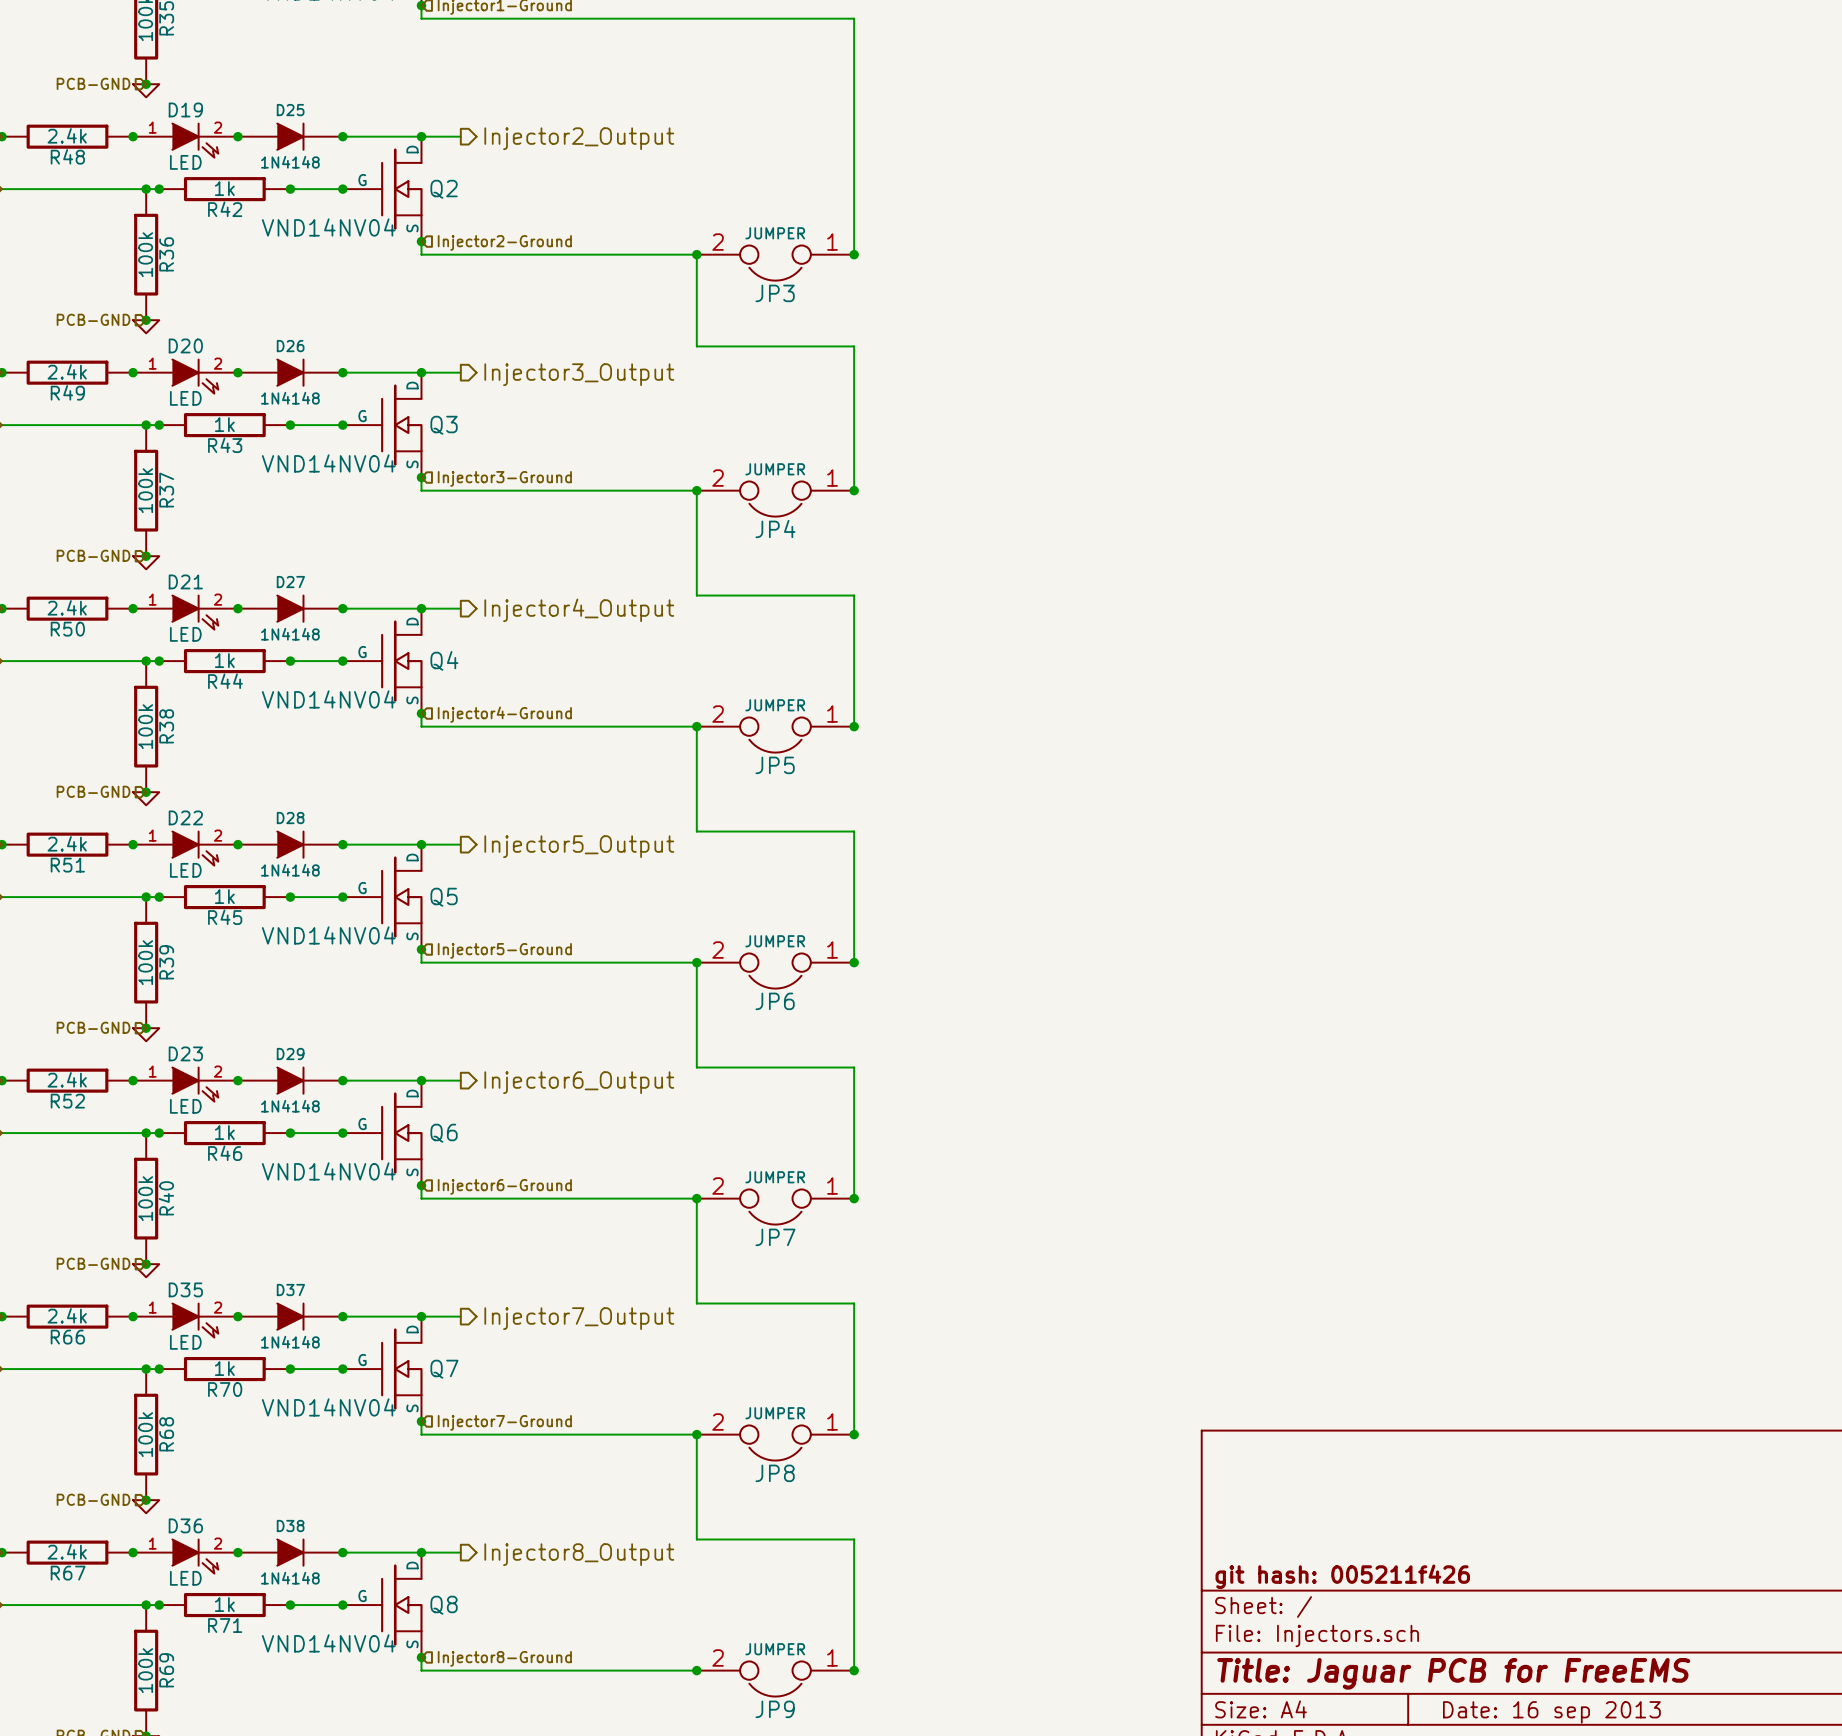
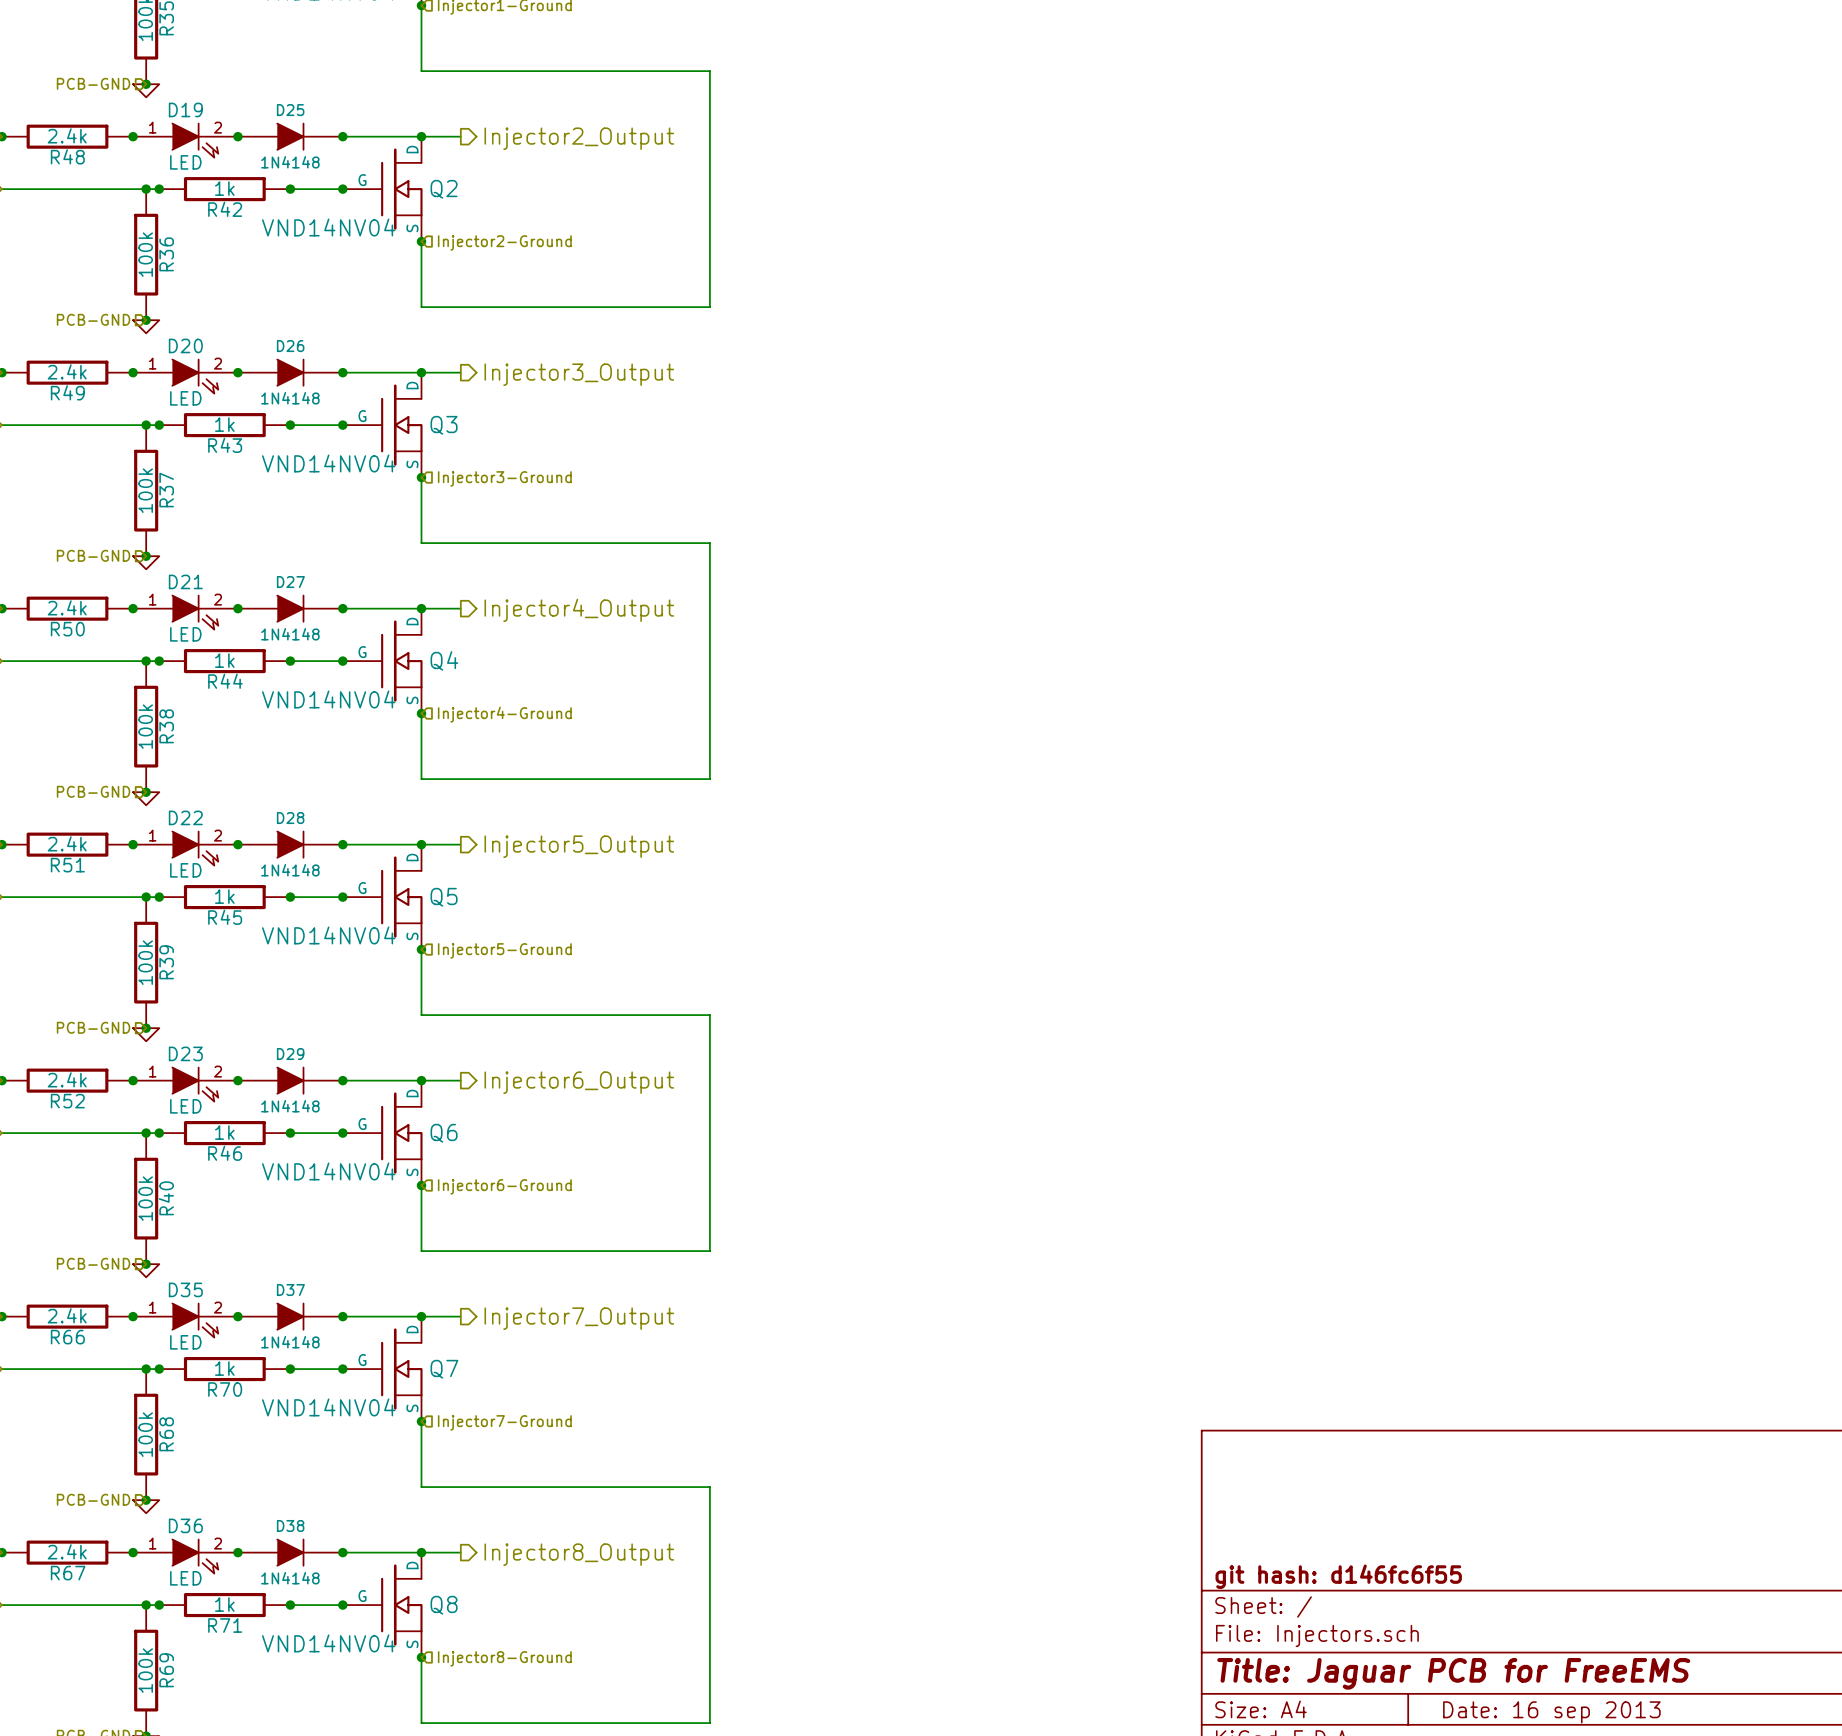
wire: (421, 18) (854, 18) (854, 254) -> (421, 18) (421, 71) (709, 71) (709, 307) (421, 307) (421, 254)
wire: (421, 254) (696, 254) (696, 346) (854, 346) (854, 490) -> none
junction: (696, 254) -> none
junction: (854, 254) -> none
JP3: JUMPER (775, 263) -> none
wire: (421, 490) (696, 490) (696, 595) (854, 595) (854, 726) -> (421, 490) (421, 543) (709, 543) (709, 779) (421, 779) (421, 726)
junction: (696, 490) -> none
junction: (854, 490) -> none
JP4: JUMPER (775, 499) -> none
wire: (421, 726) (696, 726) (696, 831) (854, 831) (854, 962) -> none
junction: (696, 726) -> none
junction: (854, 726) -> none
JP5: JUMPER (775, 735) -> none
wire: (421, 962) (696, 962) (696, 1067) (854, 1067) (854, 1198) -> (421, 962) (421, 1015) (709, 1015) (709, 1251) (421, 1251) (421, 1198)
junction: (696, 962) -> none
junction: (854, 962) -> none
JP6: JUMPER (775, 971) -> none
wire: (421, 1198) (696, 1198) (696, 1303) (854, 1303) (854, 1434) -> none
junction: (696, 1198) -> none
junction: (854, 1198) -> none
JP7: JUMPER (775, 1207) -> none
wire: (421, 1434) (696, 1434) (696, 1539) (854, 1539) (854, 1670) -> none
junction: (696, 1434) -> none
junction: (854, 1434) -> none
JP8: JUMPER (775, 1443) -> none
title block: git hash: 005211f426 (1342, 1576) -> git hash: d146fc6f55 (1338, 1576)
wire: (421, 1670) (696, 1670) -> (421, 1670) (421, 1723) (709, 1723) (709, 1487) (421, 1487) (421, 1434)
junction: (696, 1670) -> none
junction: (854, 1670) -> none
JP9: JUMPER (775, 1678) -> none

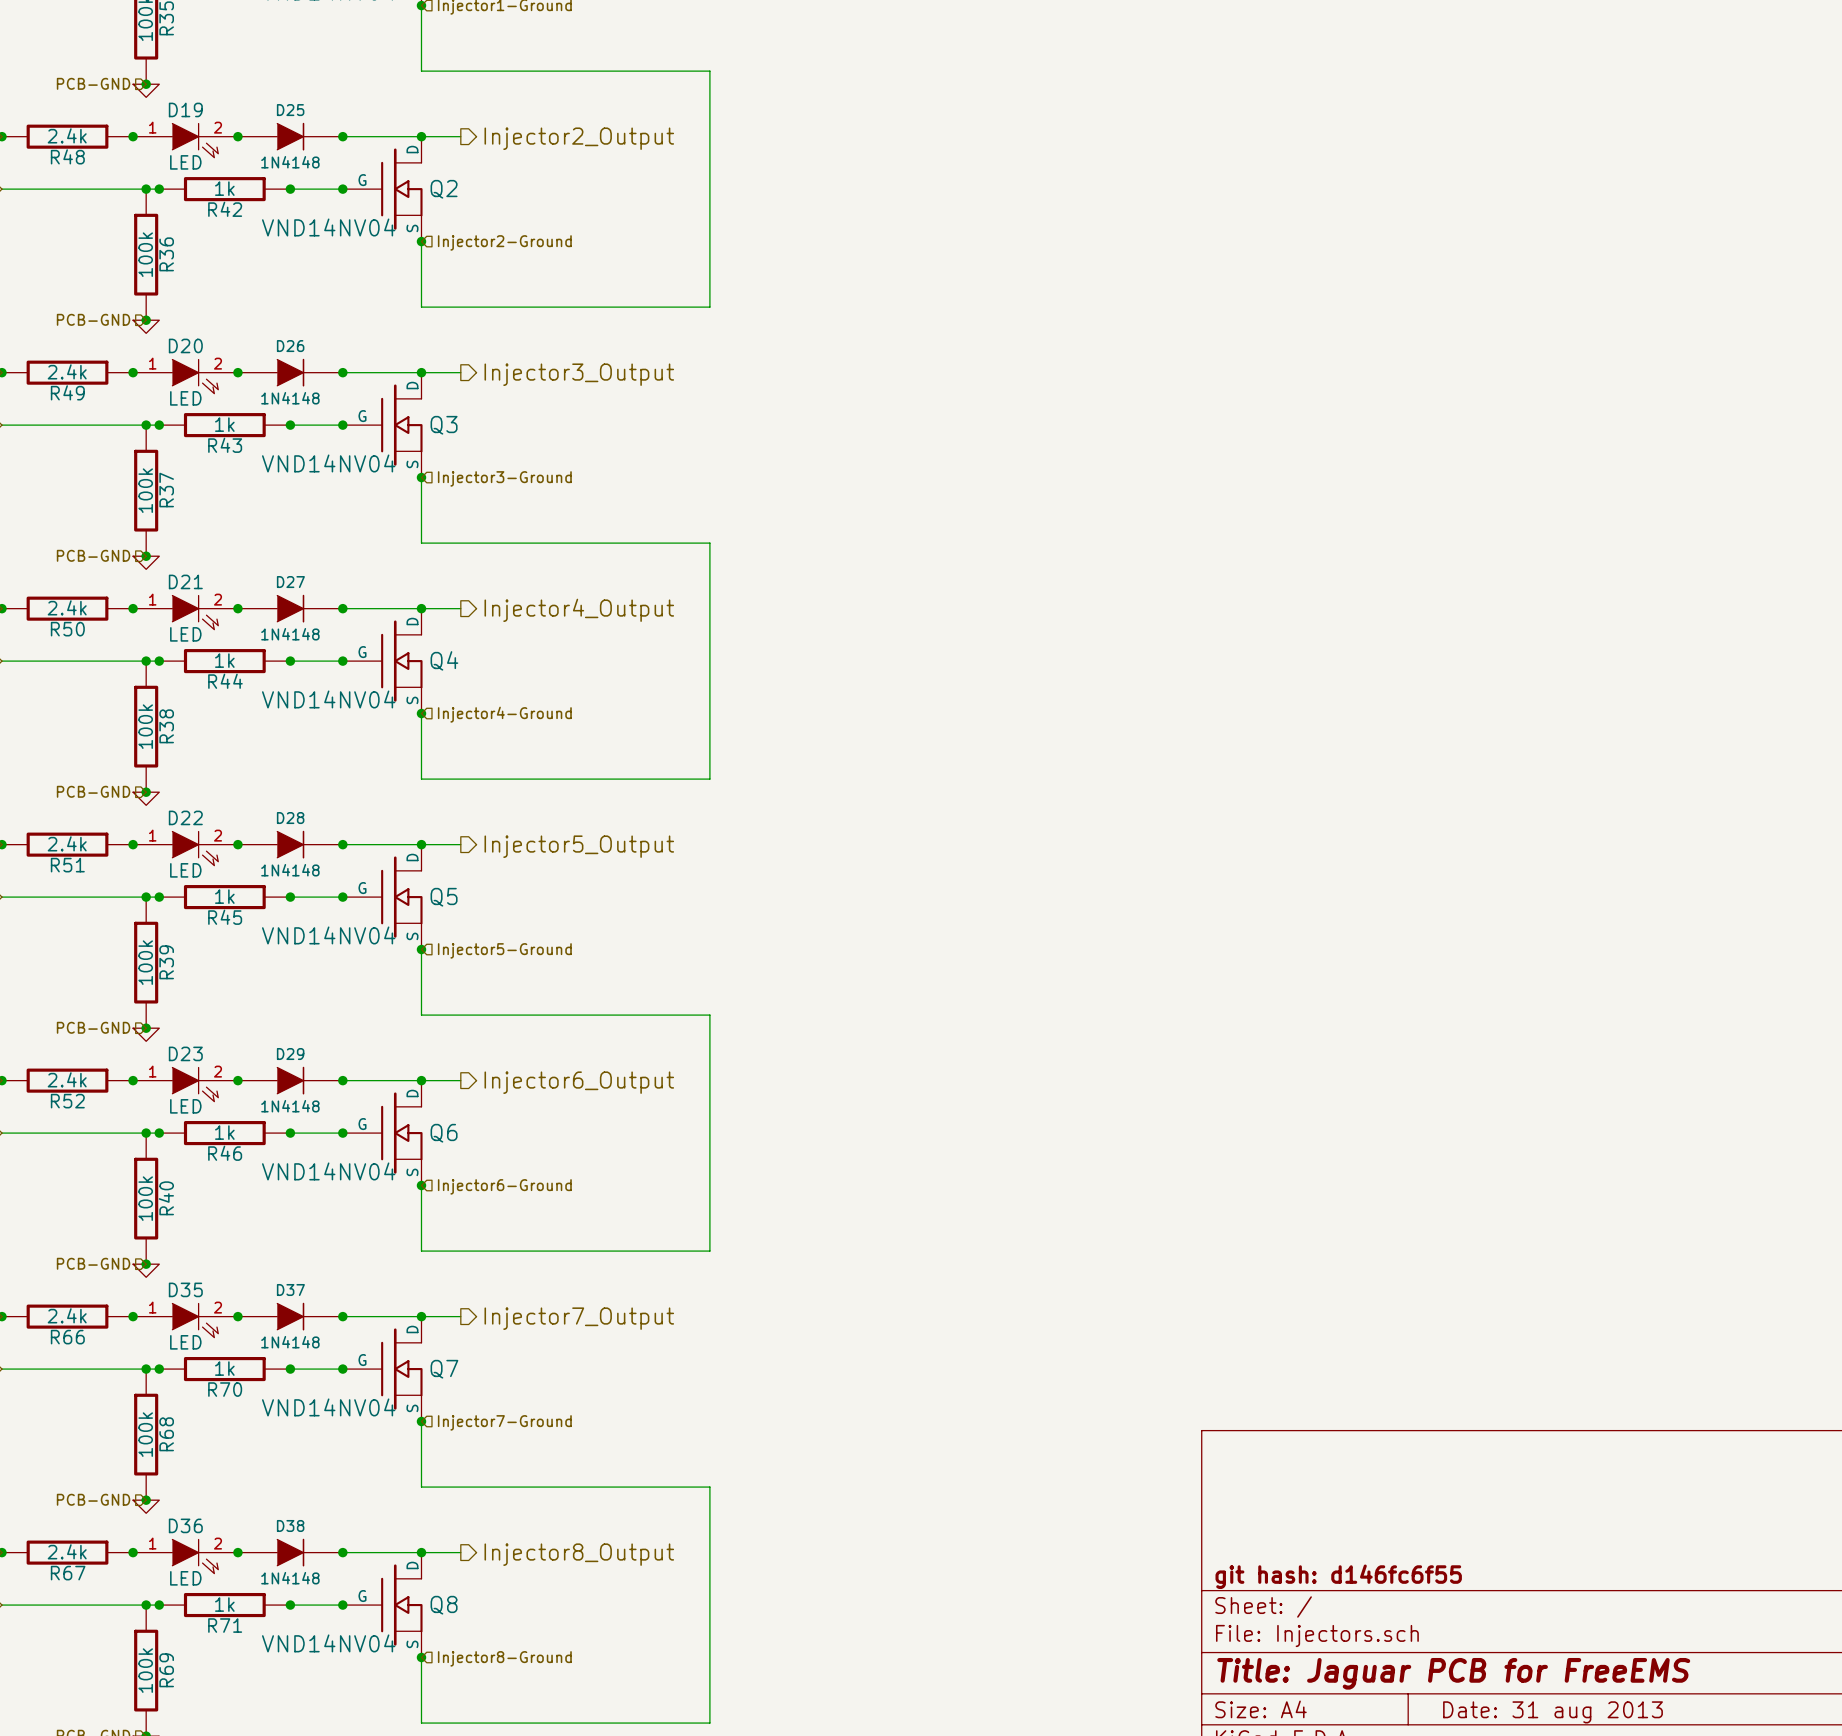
title block: Date: 16 sep 2013 (1551, 1712) -> Date: 31 aug 2013 (1553, 1712)

